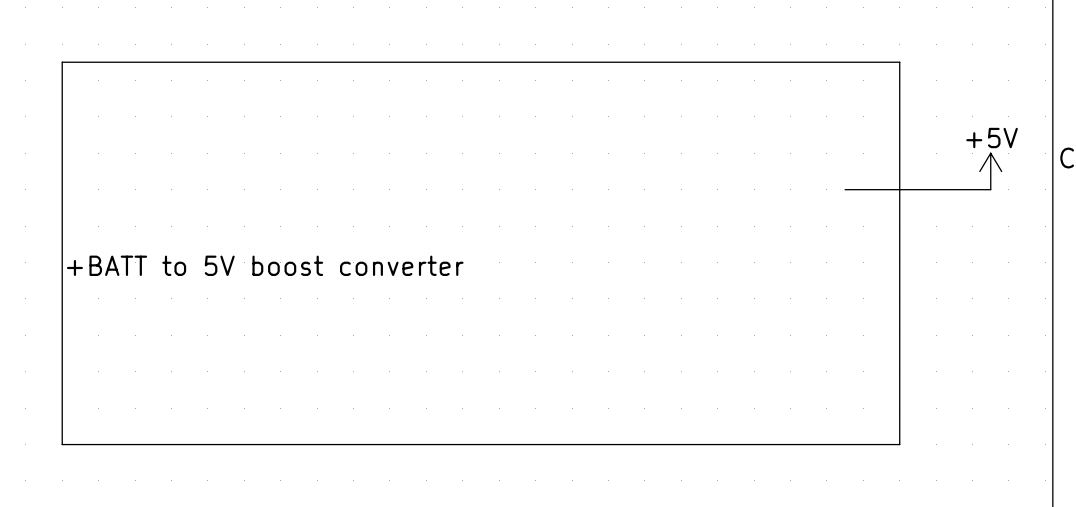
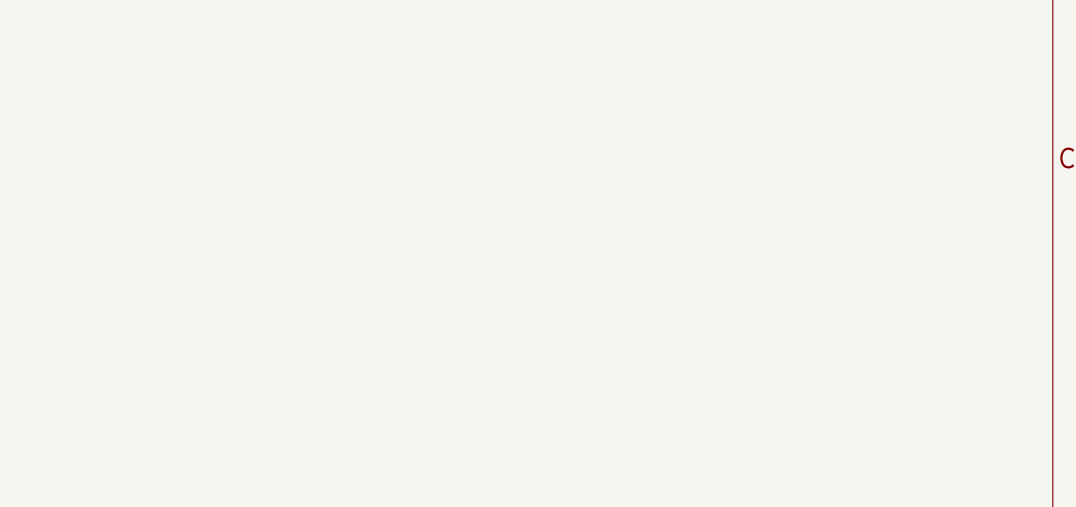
line: (62, 62) (62, 444) (899, 444) (899, 62) (62, 62) -> none
power symbol: +5V (990, 171) -> none
wire: (845, 189) (990, 189) -> none
text: +BATT to 5V boost converter (265, 265) -> none

